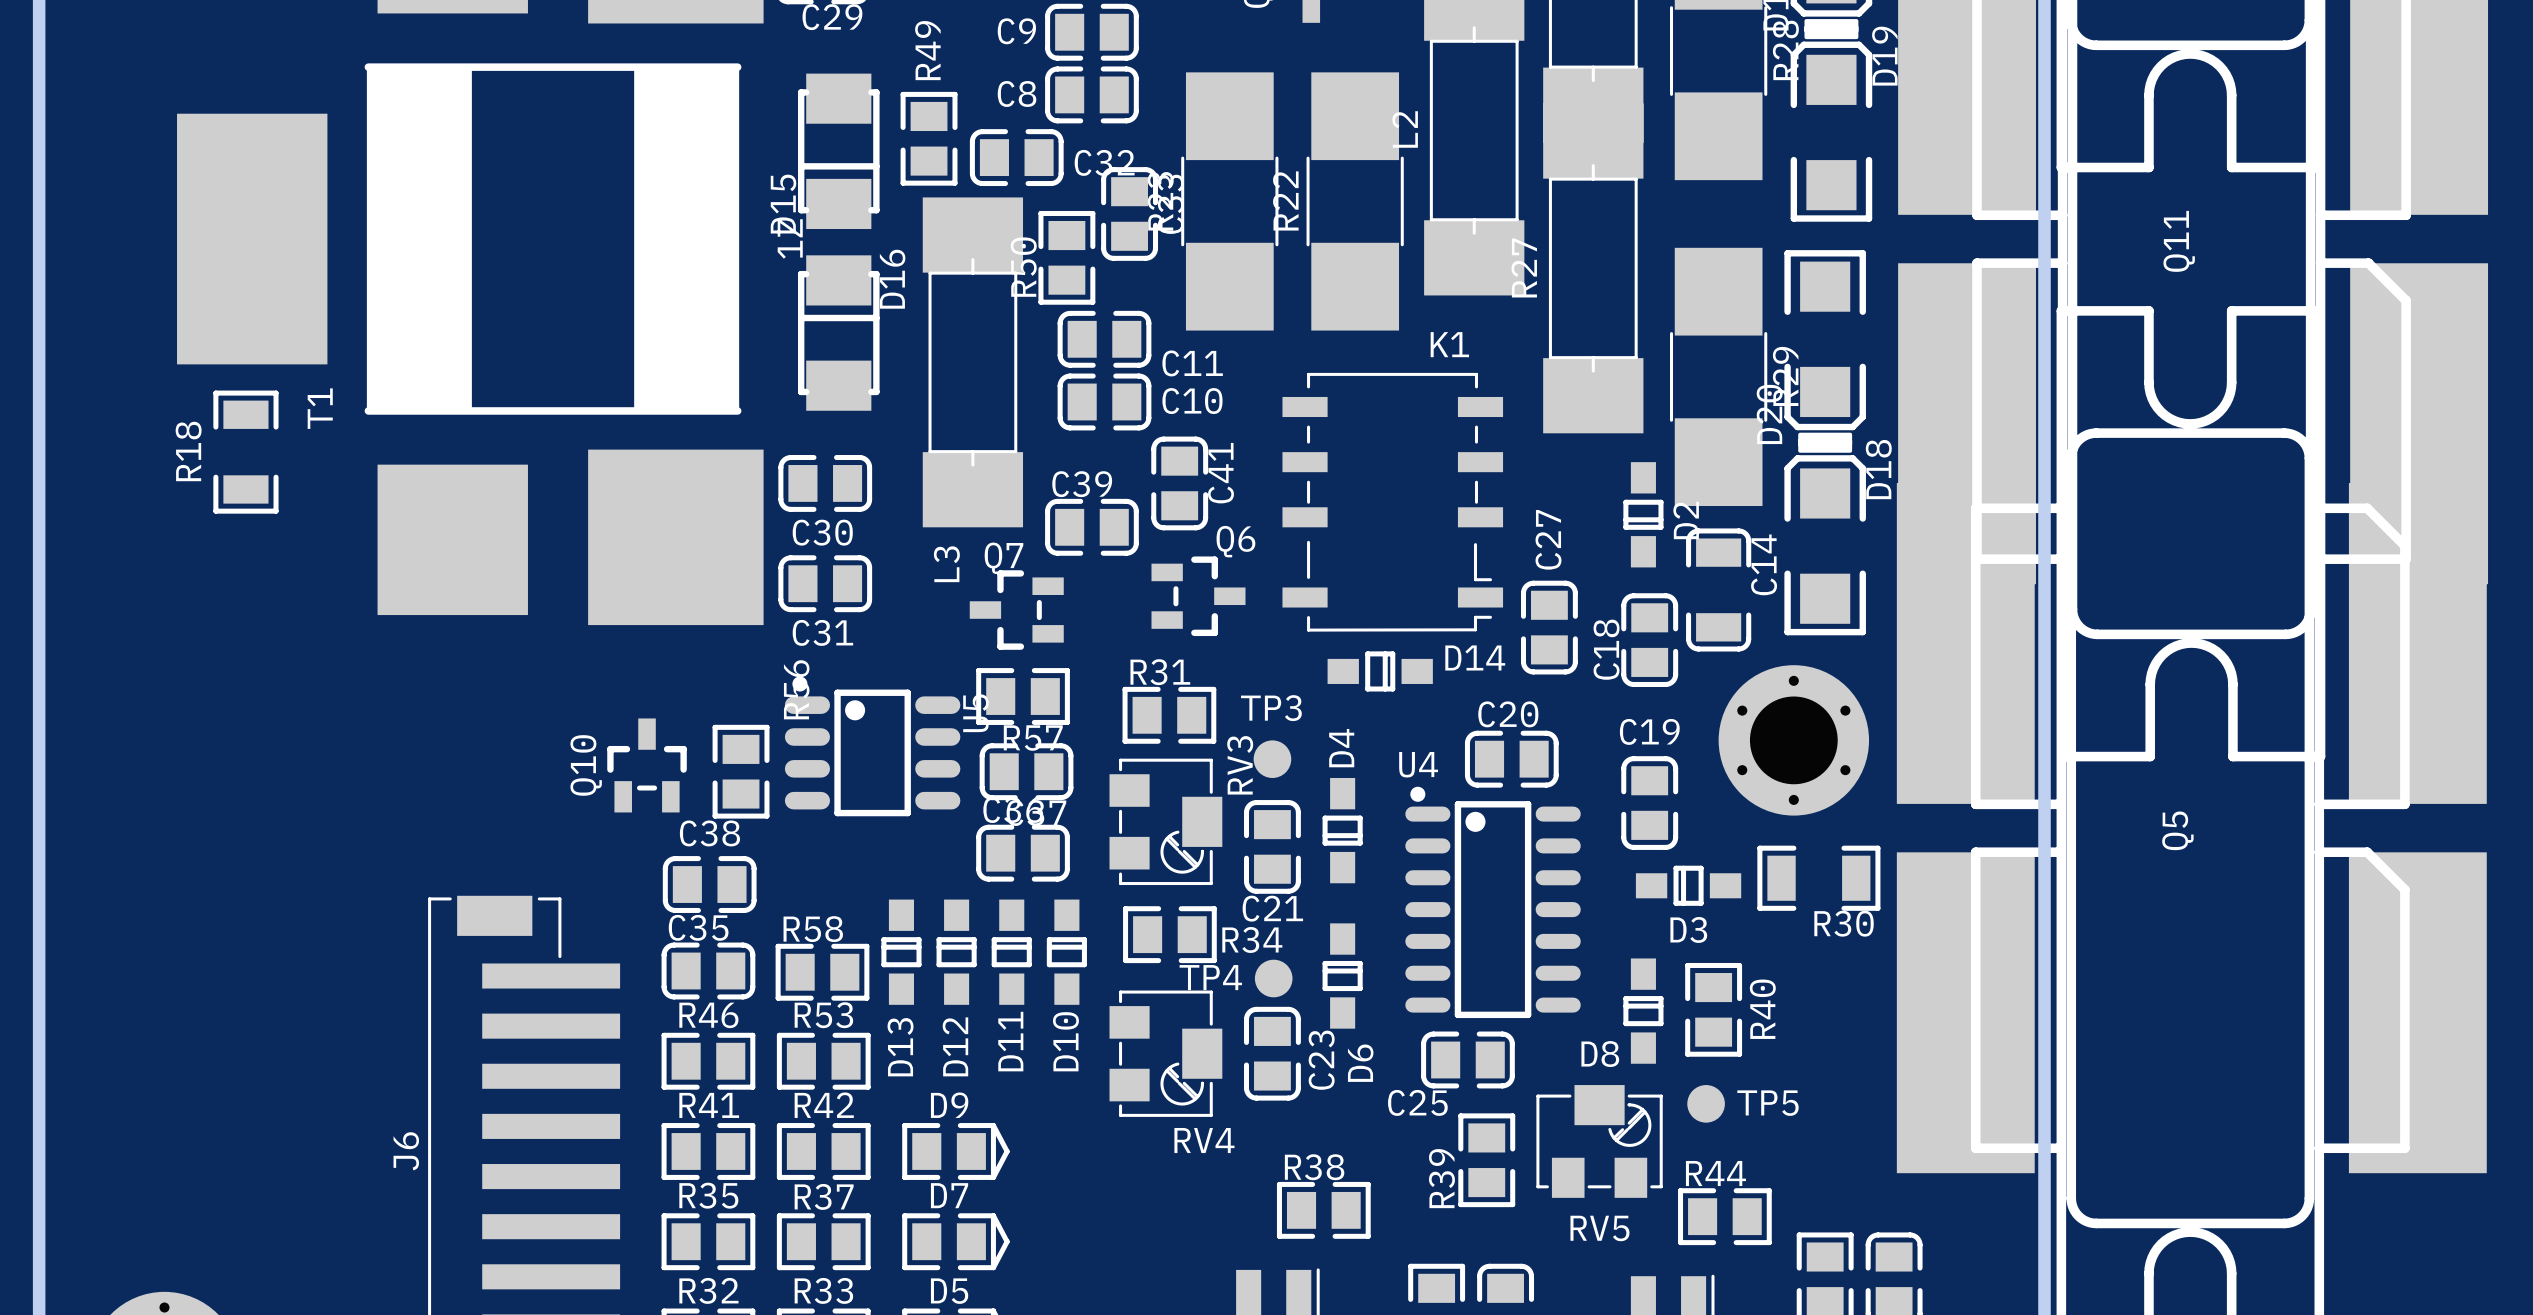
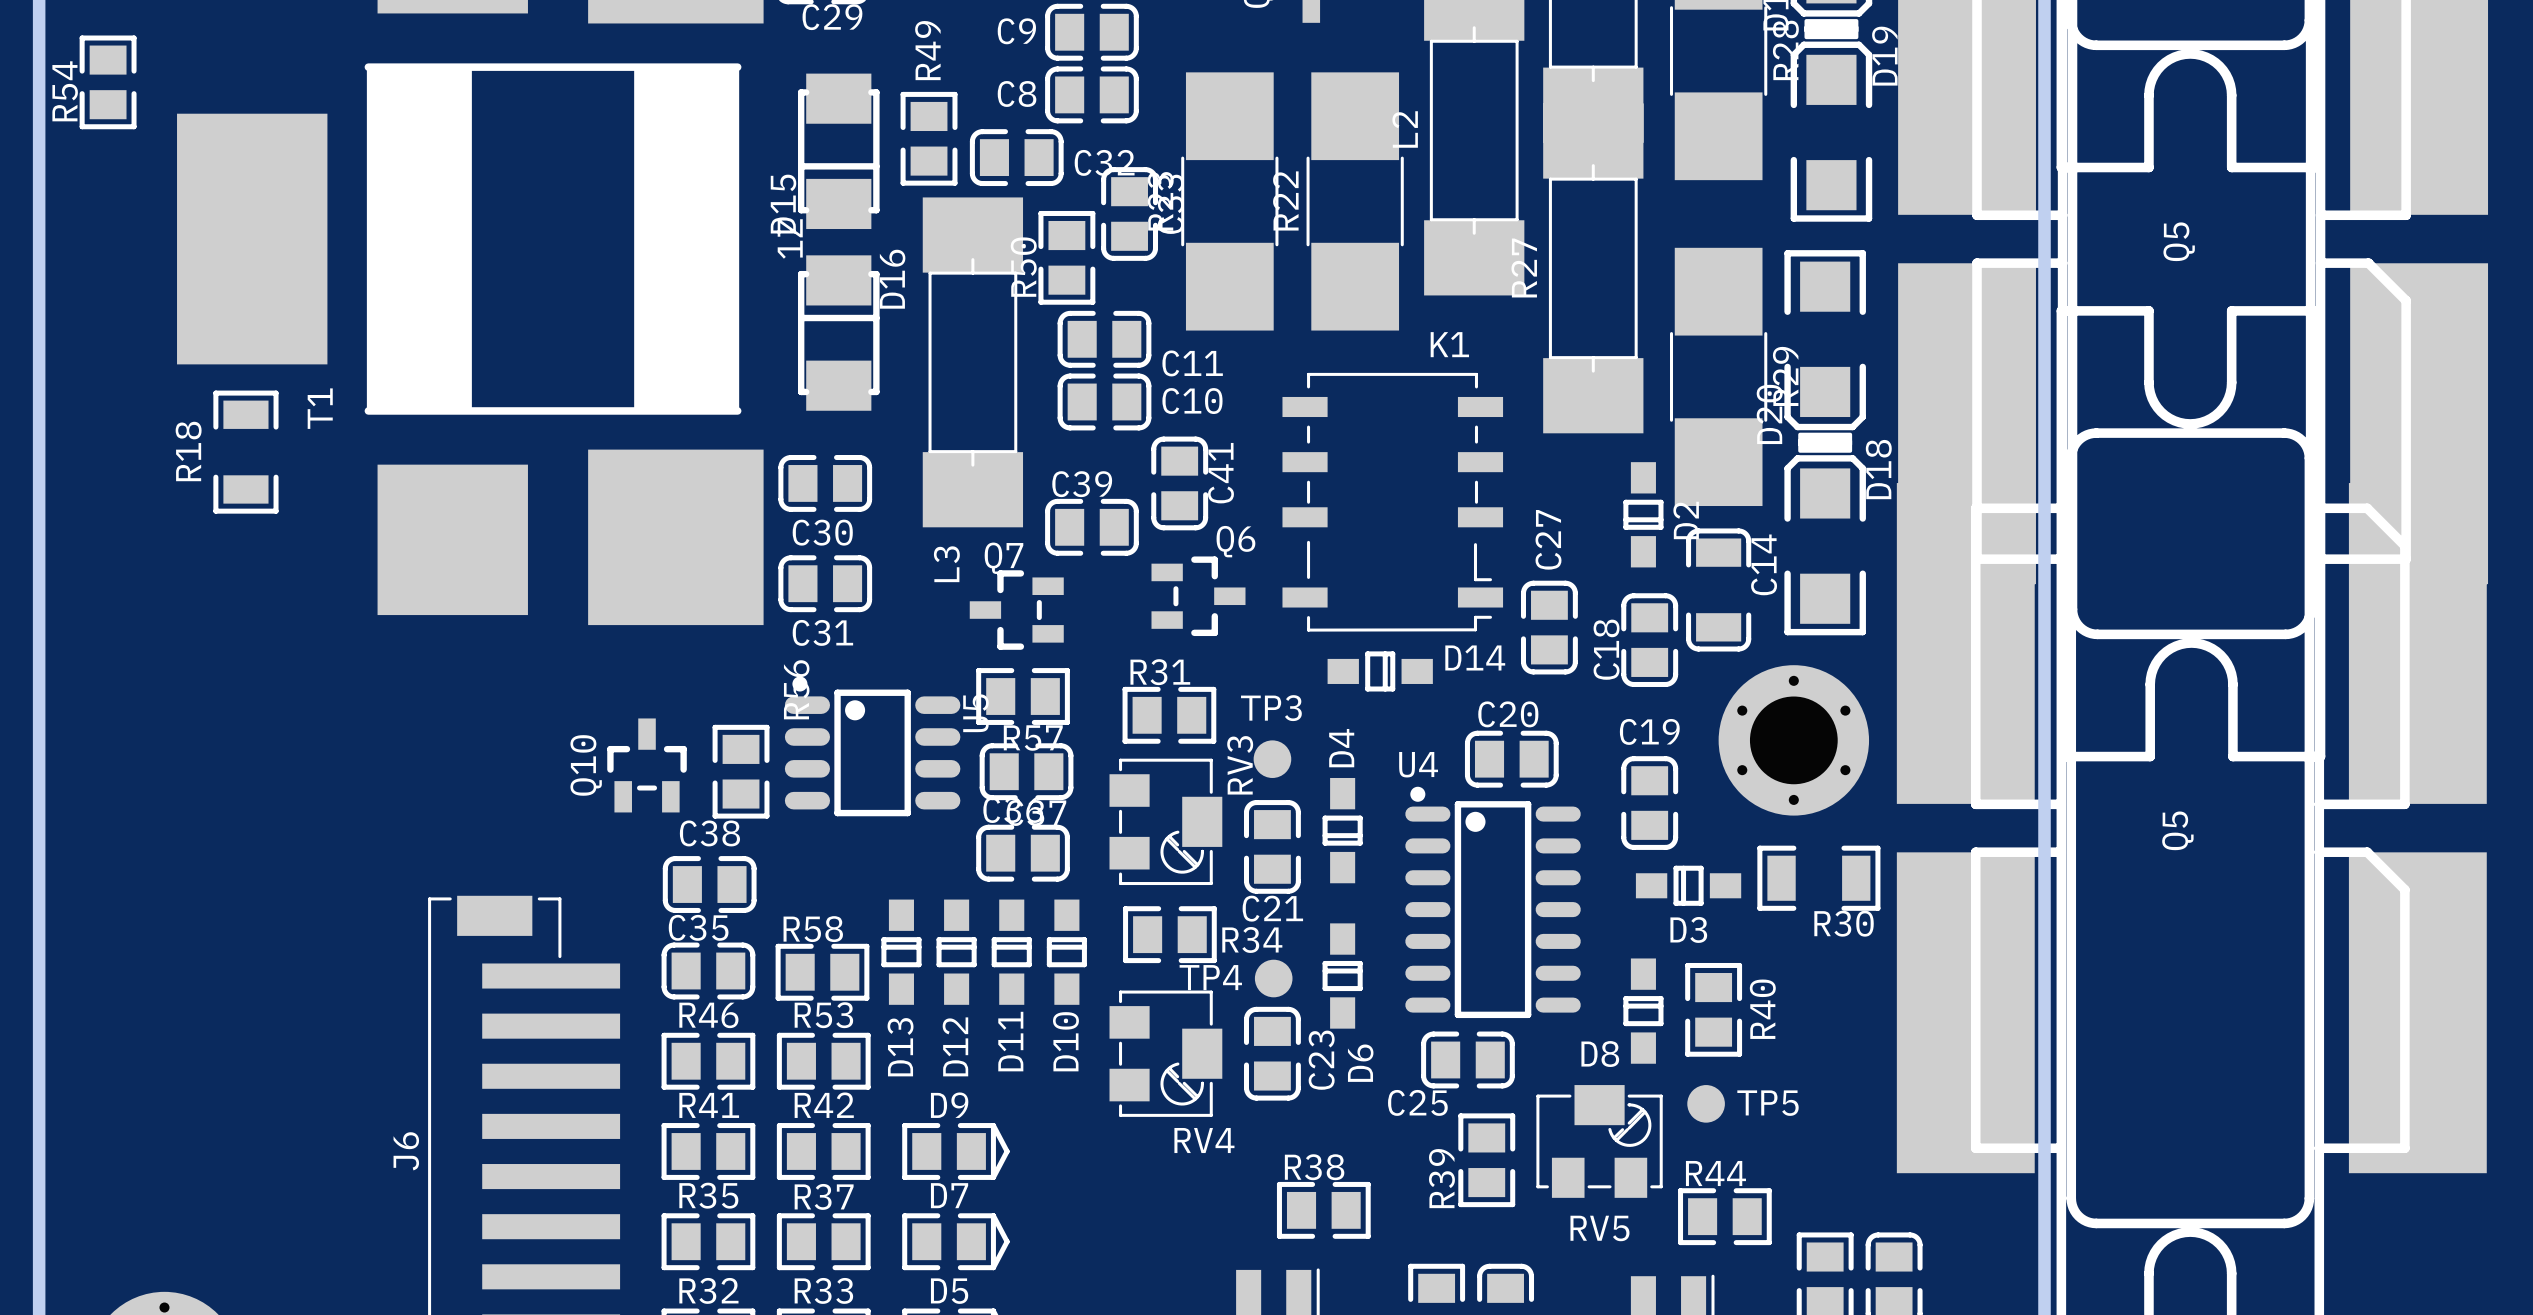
R54: none -> (108, 82)
Q11 name: Q11 (2179, 241) -> Q5 (2179, 241)

